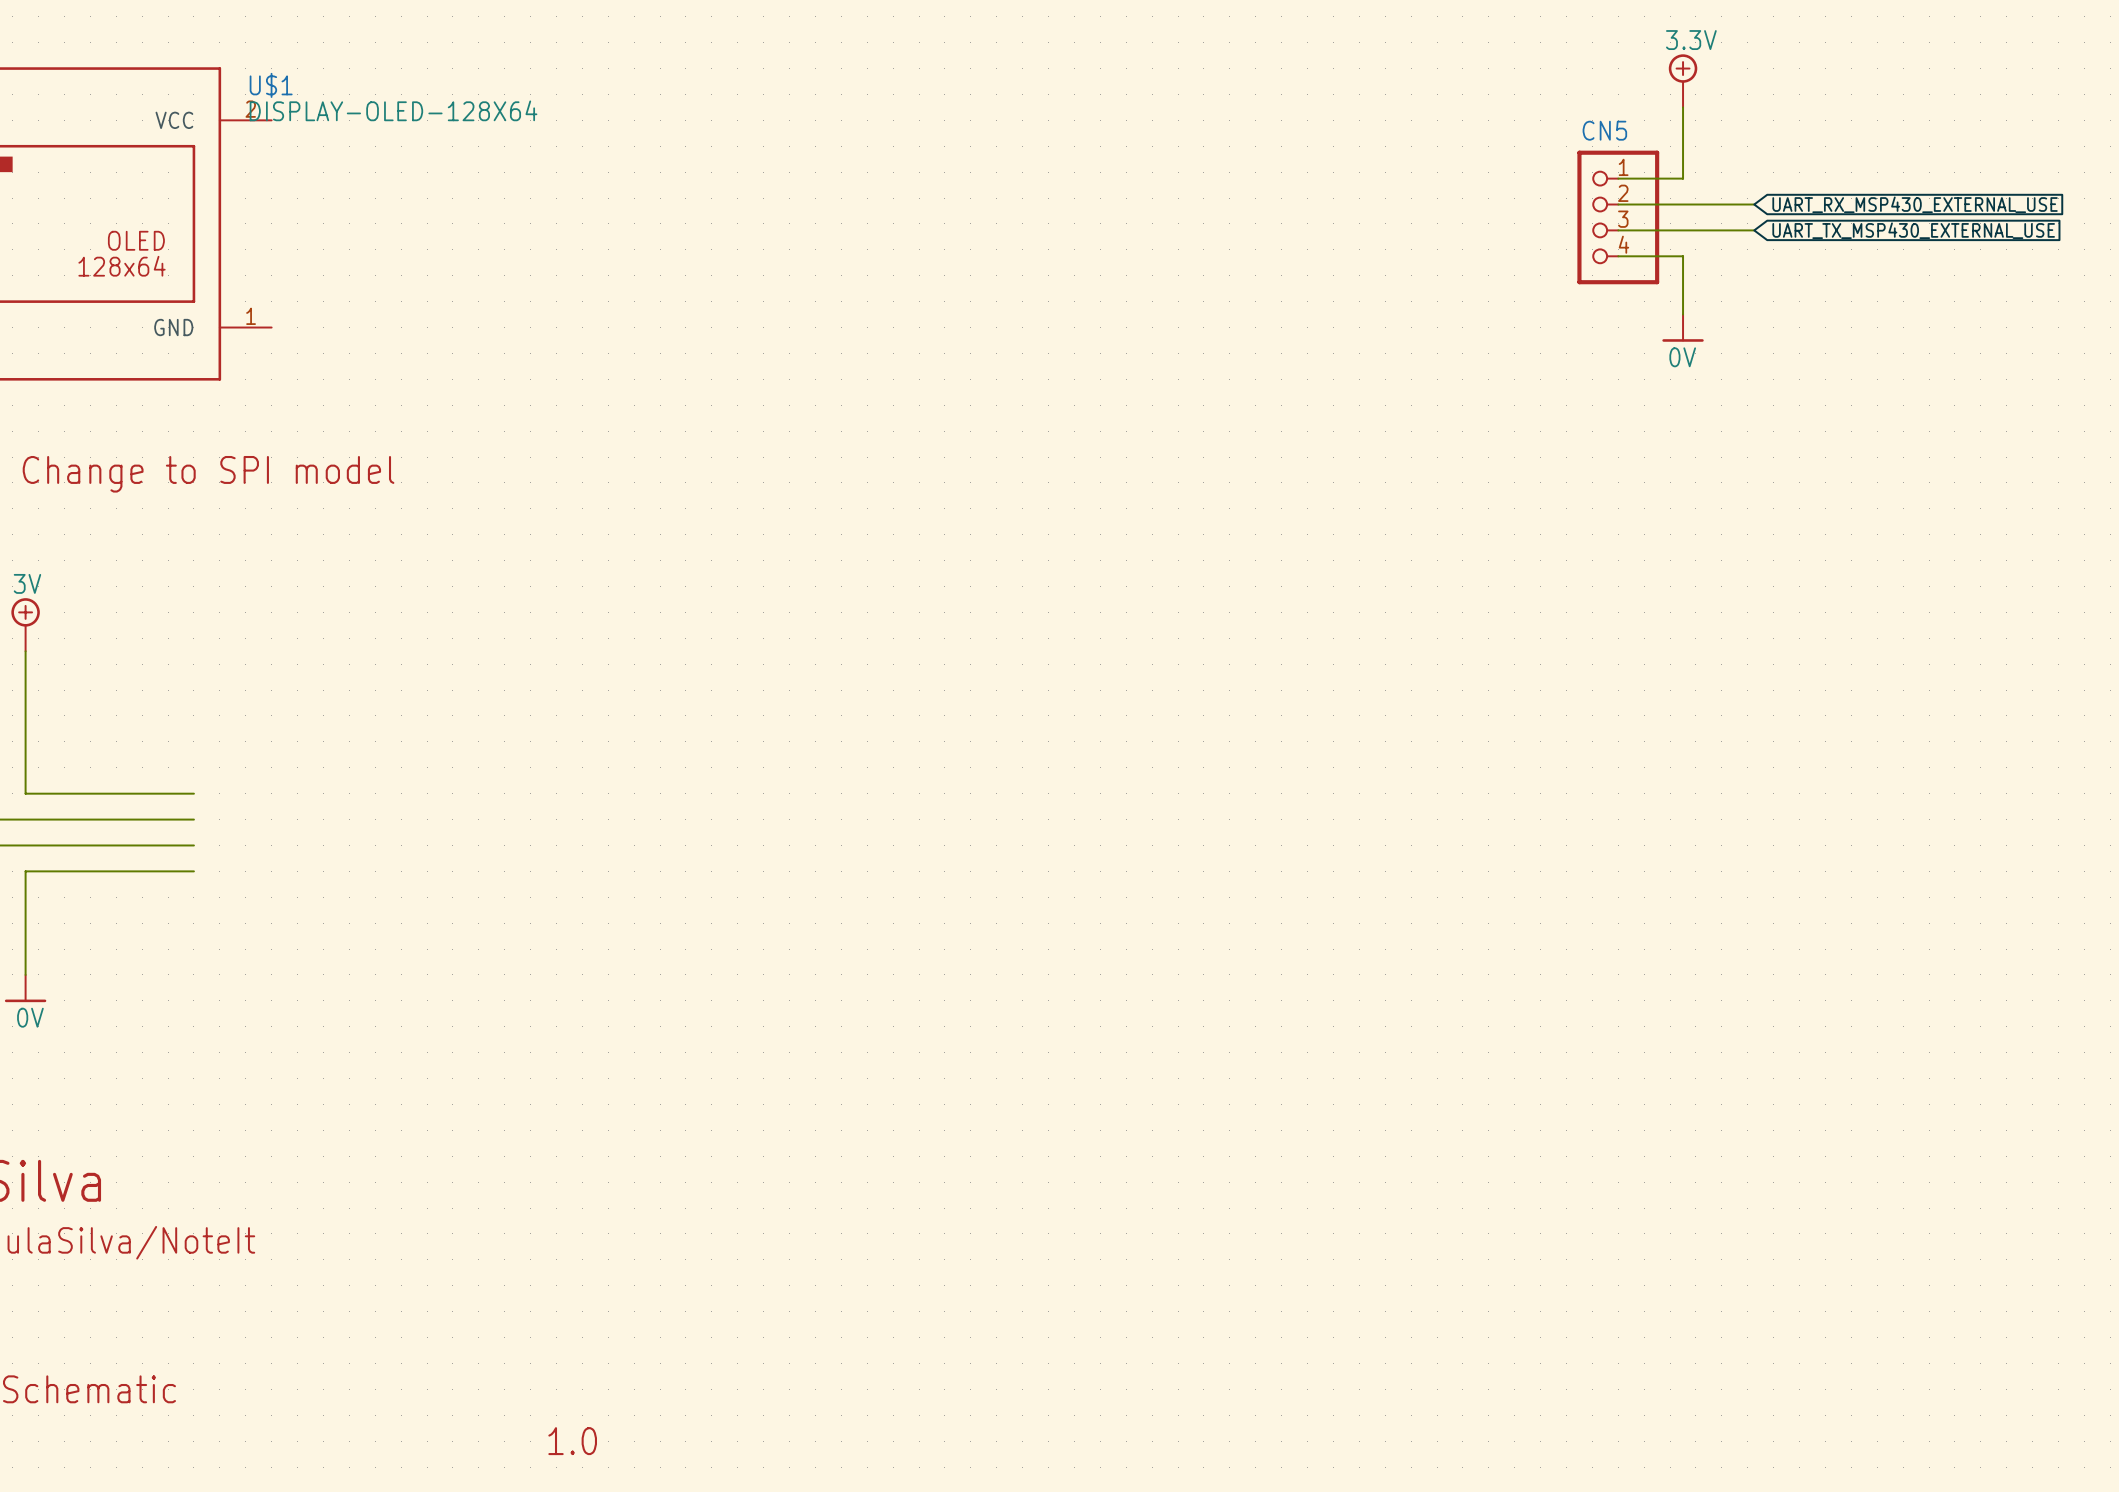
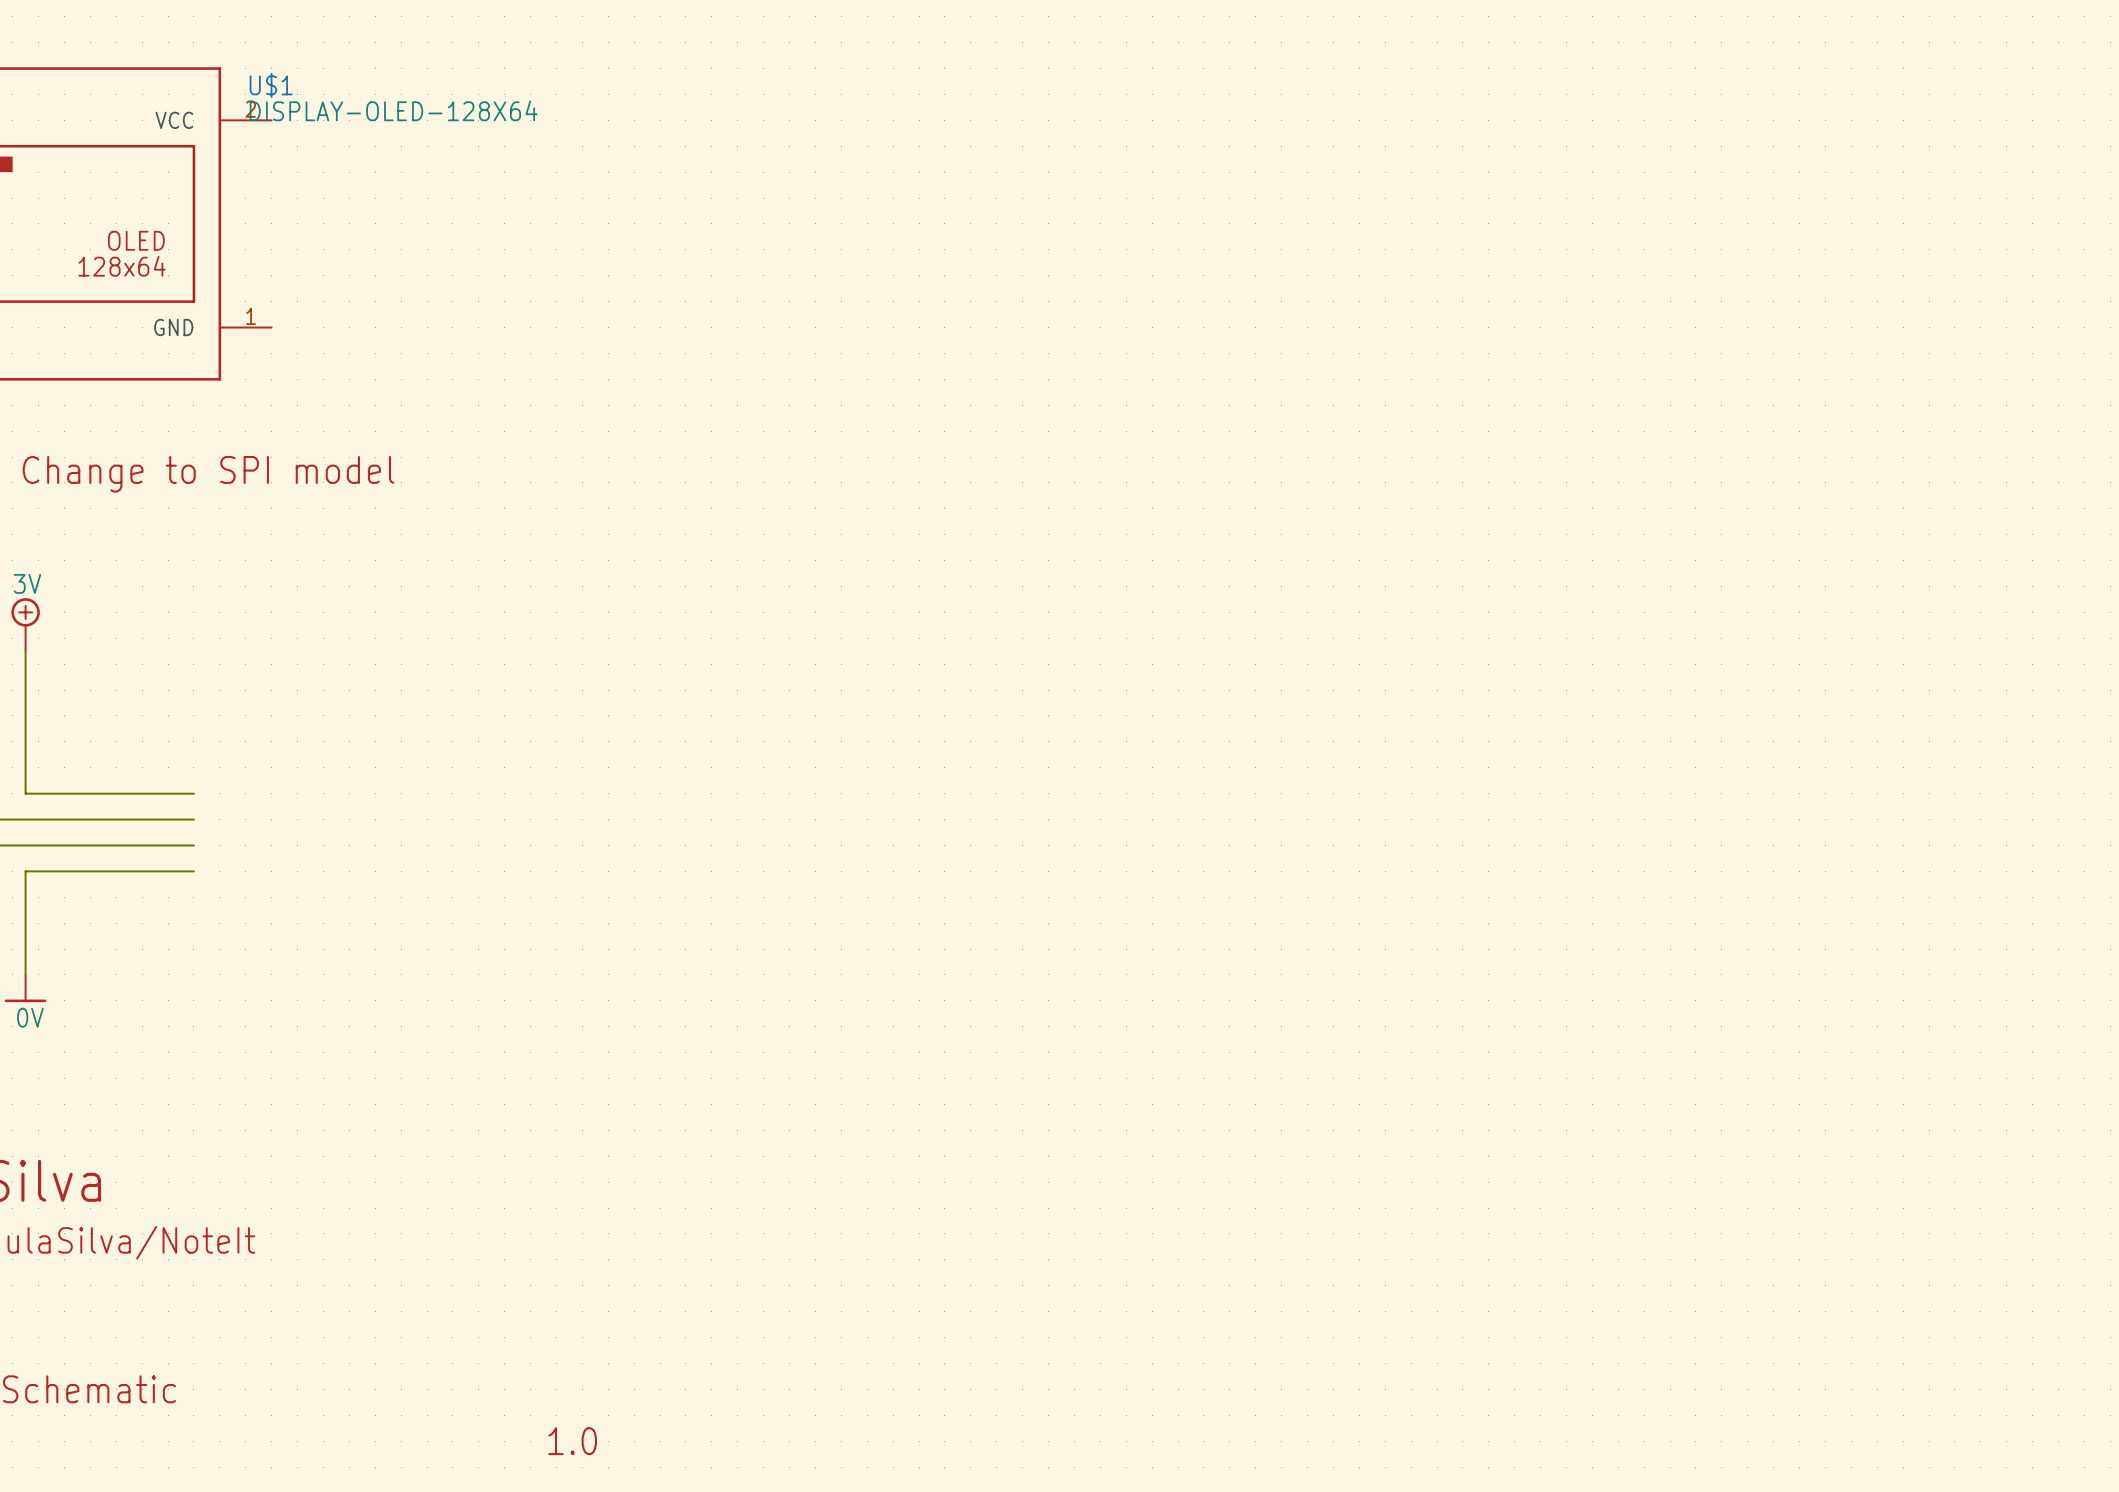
power symbol: 3.3V (1683, 80) -> none
wire: (1683, 107) (1683, 178) (1618, 178) -> none
wire: (1618, 204) (1754, 204) -> none
global label: UART_RX_MSP430_EXTERNAL_USE (1915, 204) -> none
CN5: (1618, 217) -> none
wire: (1618, 230) (1754, 230) -> none
global label: UART_TX_MSP430_EXTERNAL_USE (1913, 230) -> none
wire: (1618, 256) (1683, 256) (1683, 314) -> none
power symbol: 0V (1683, 328) -> none

